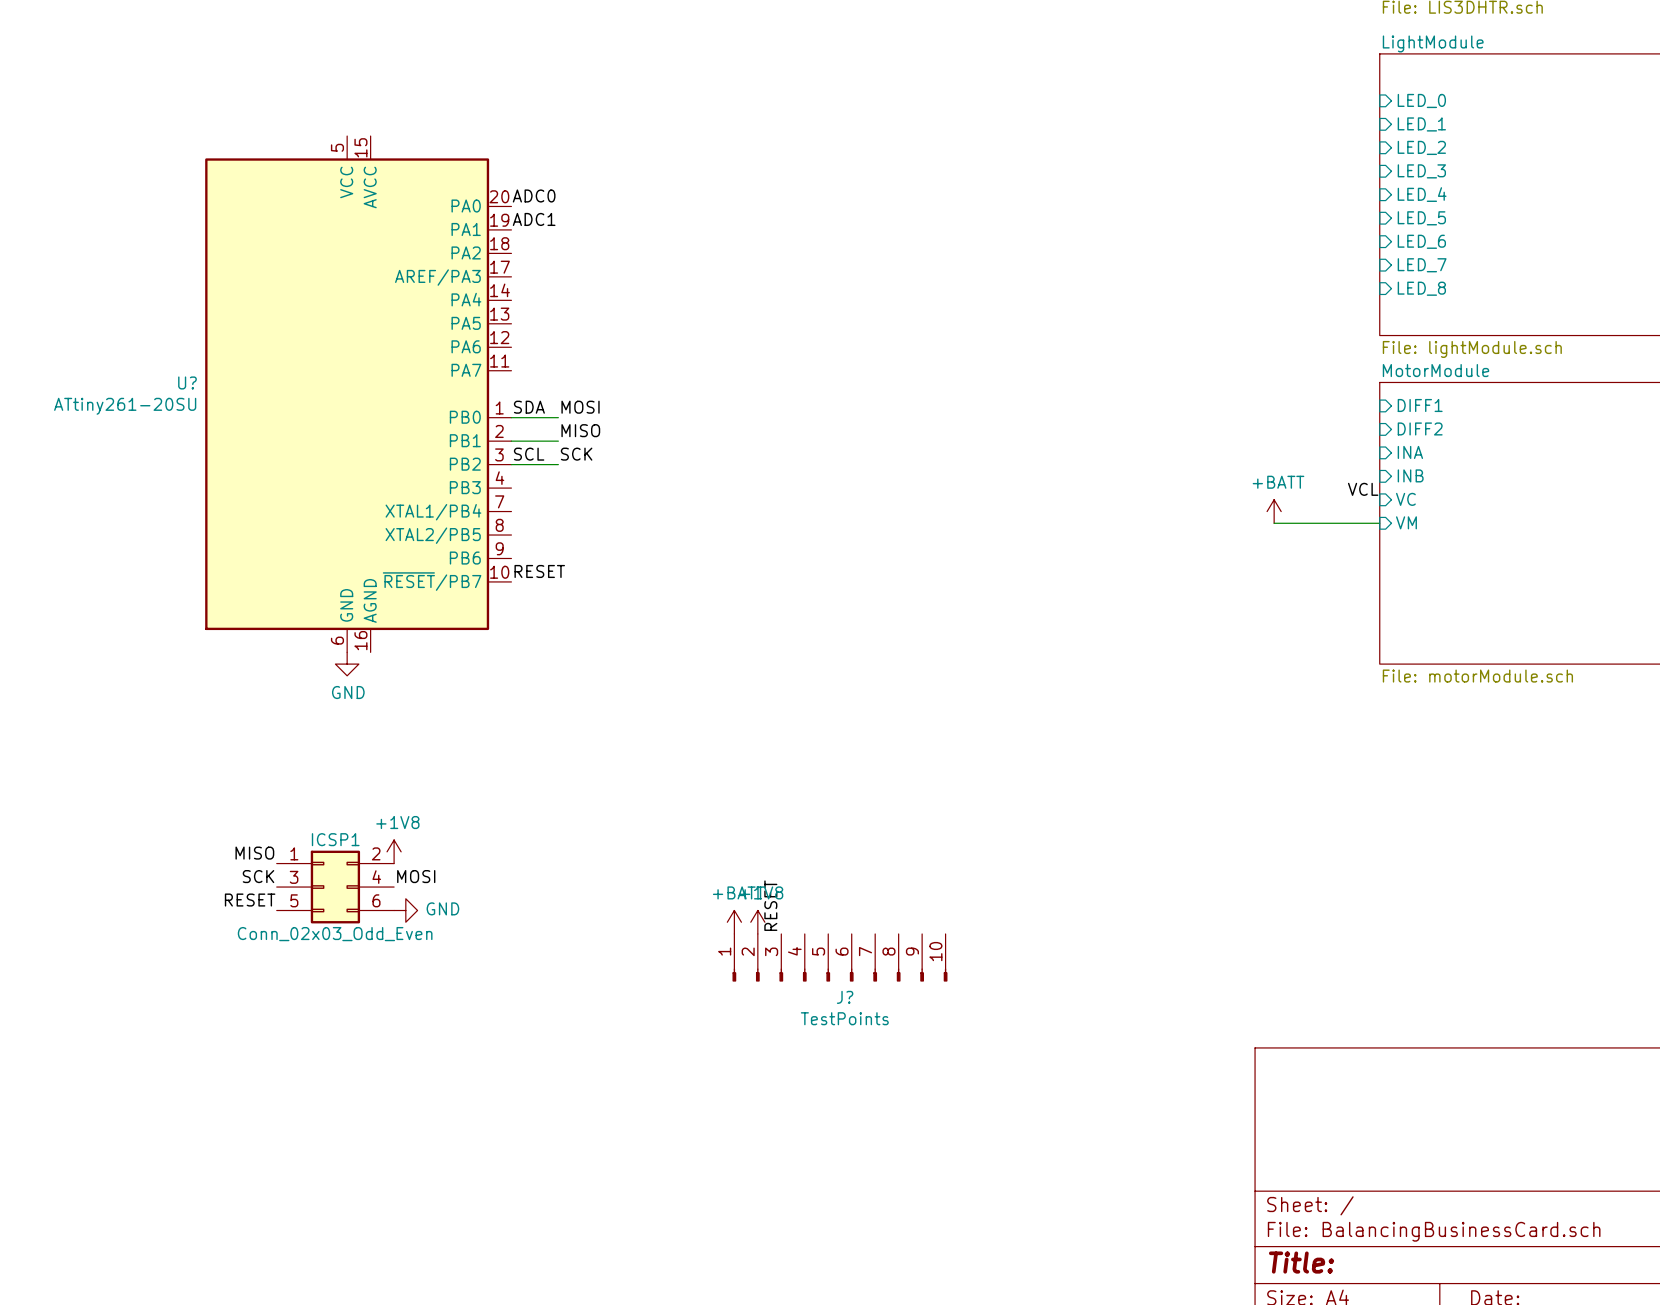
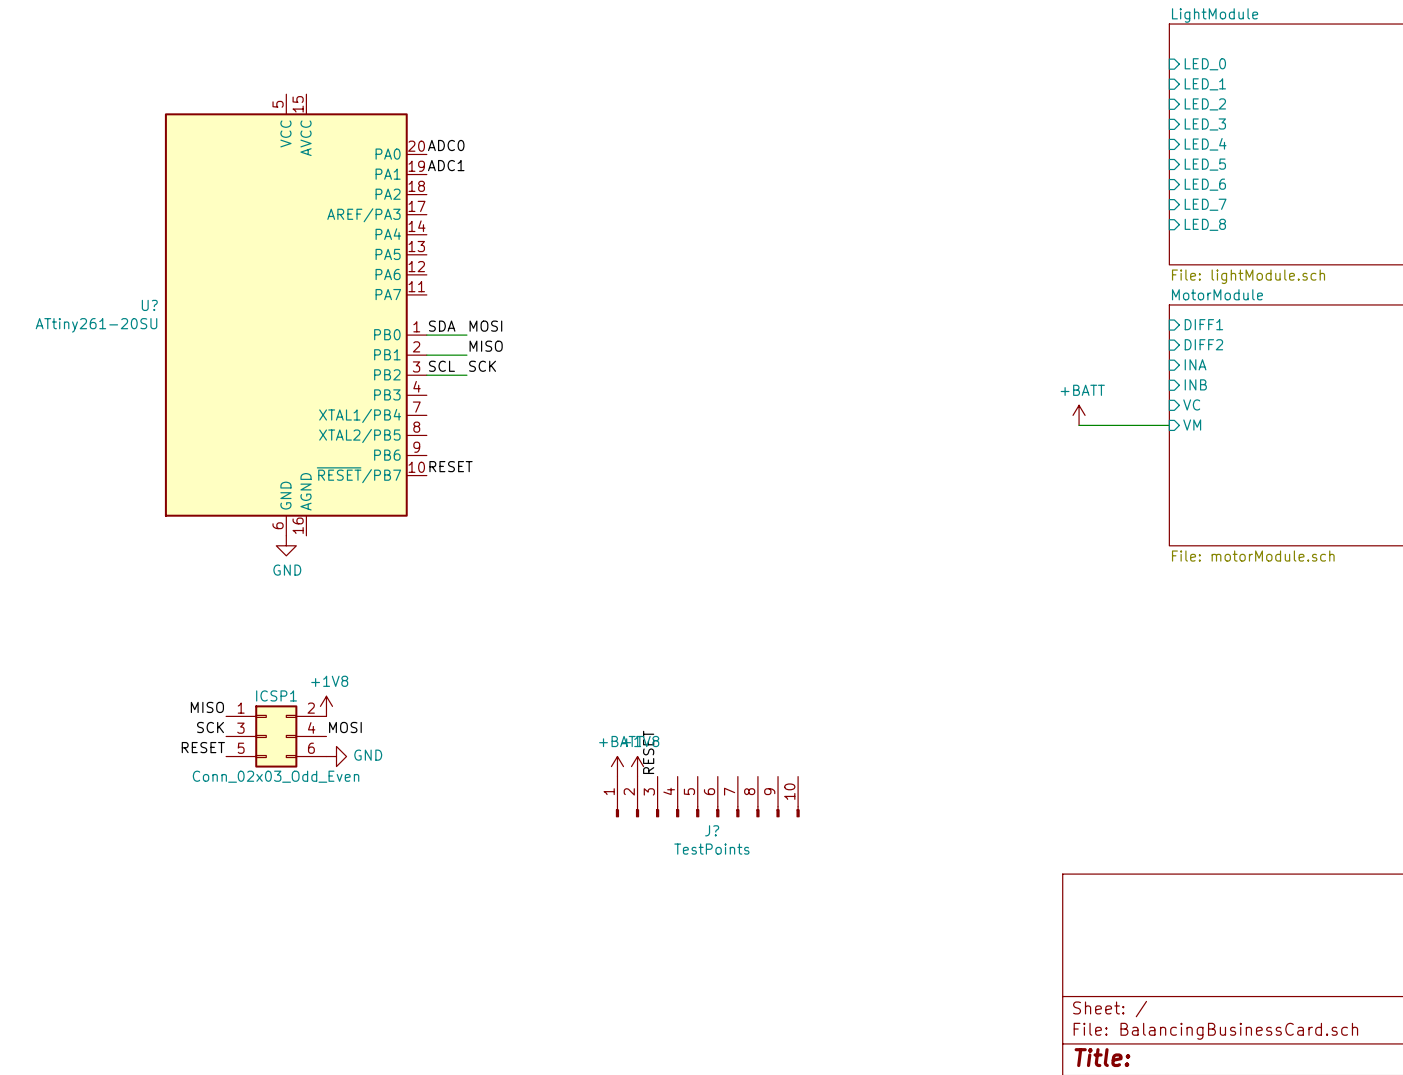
label: VCL (1363, 489) -> none

